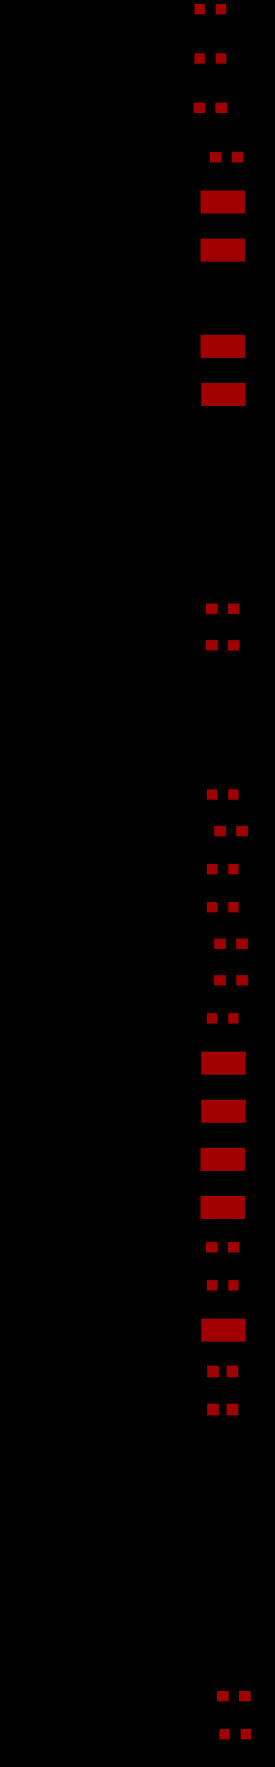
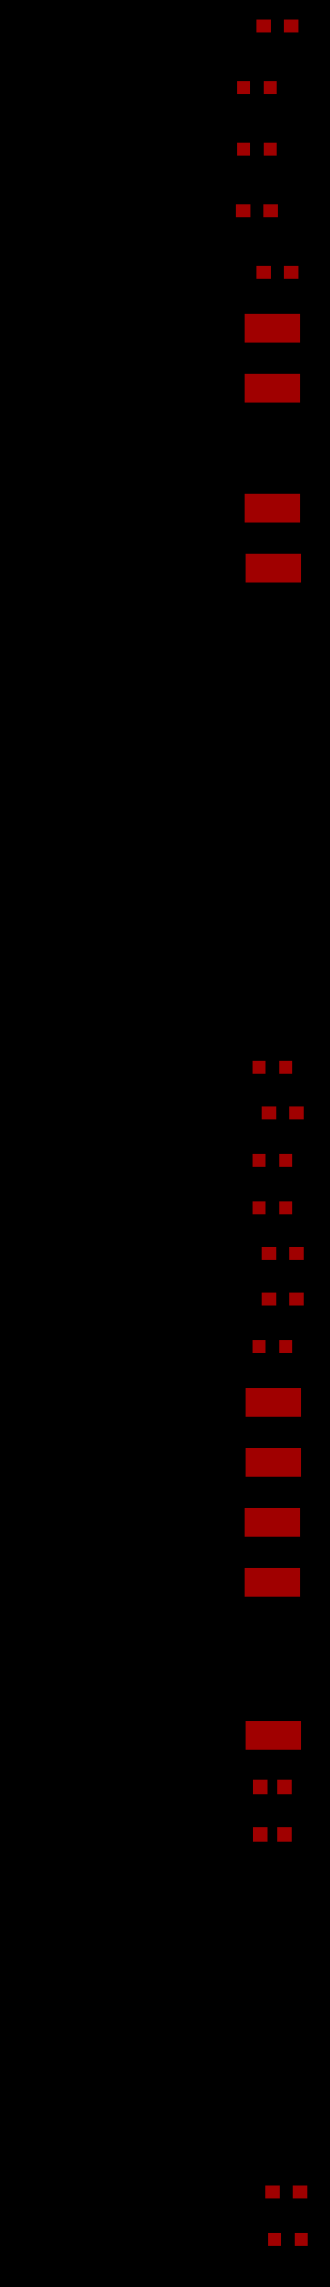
part: (222, 608) -> none
part: (222, 645) -> none
part: (222, 1247) -> none
part: (222, 1285) -> none

